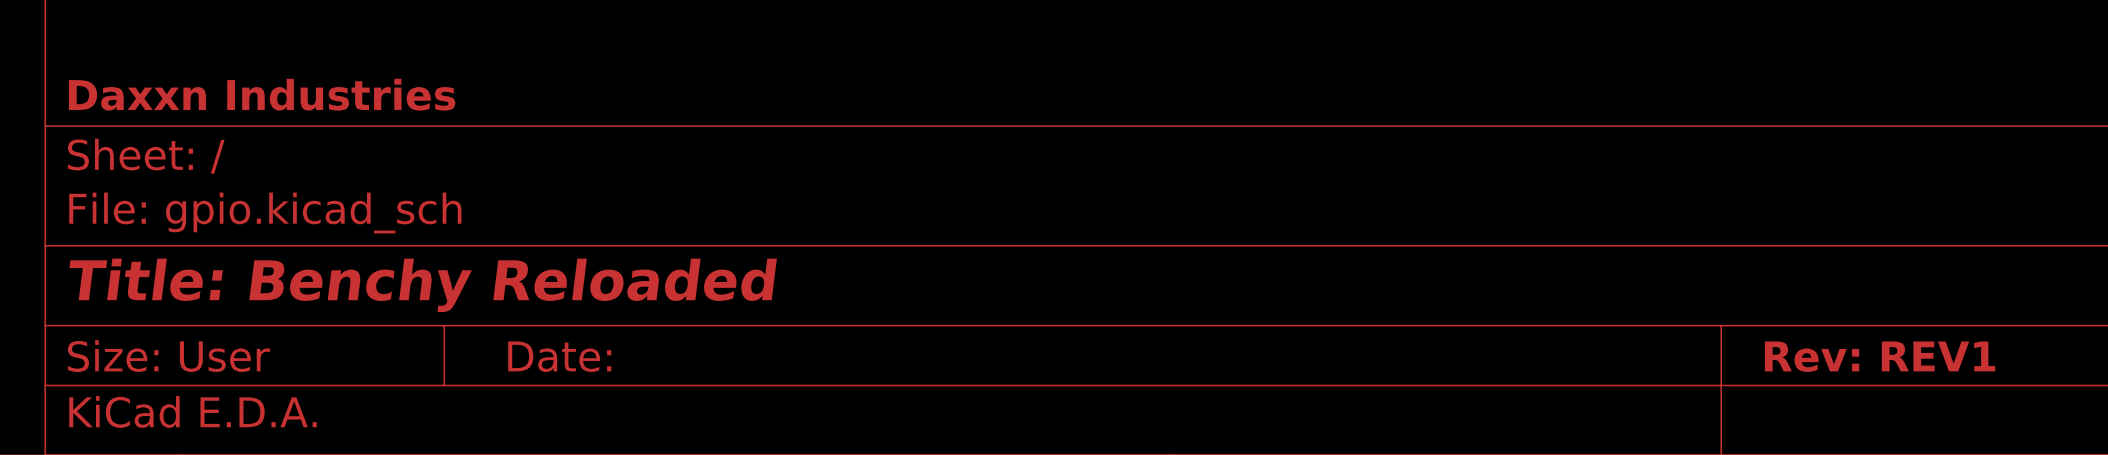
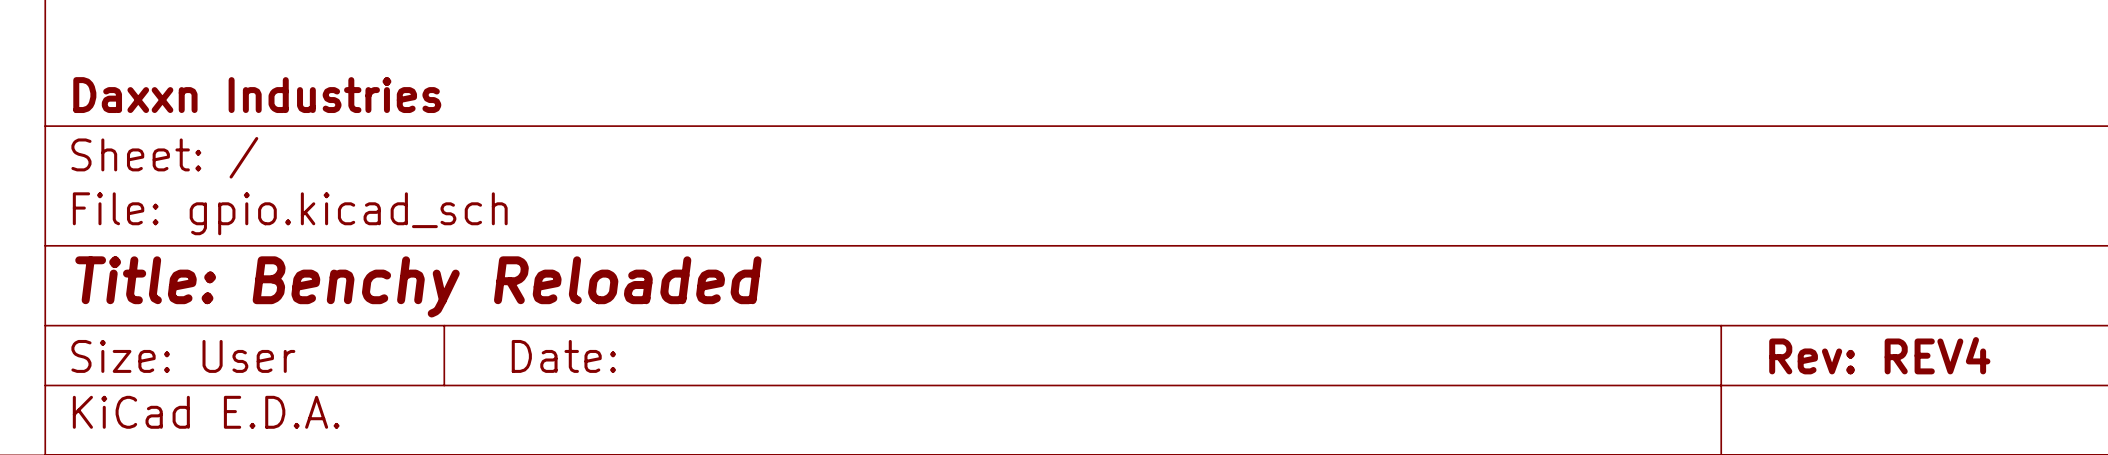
title block: Rev: REV1 (1880, 356) -> Rev: REV4 (1879, 355)

